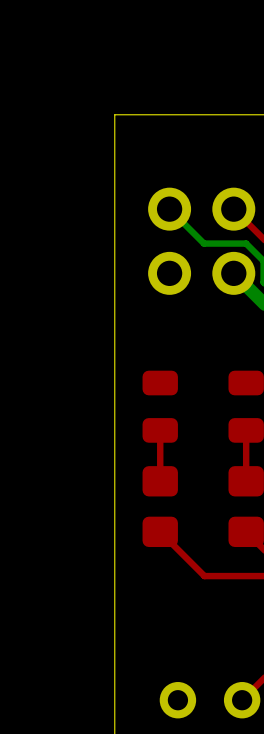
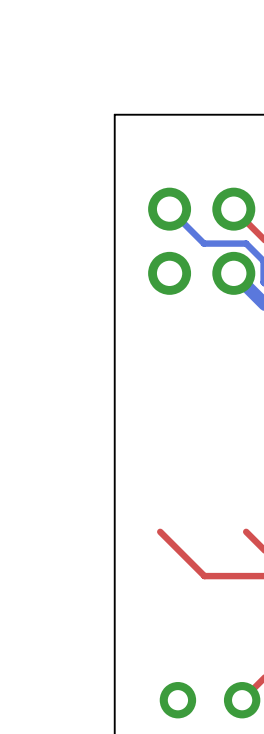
part: (160, 406) -> none
part: (246, 406) -> none
top track: (160, 430) (160, 481) -> none
top track: (246, 430) (246, 481) -> none
part: (160, 506) -> none
part: (246, 506) -> none

